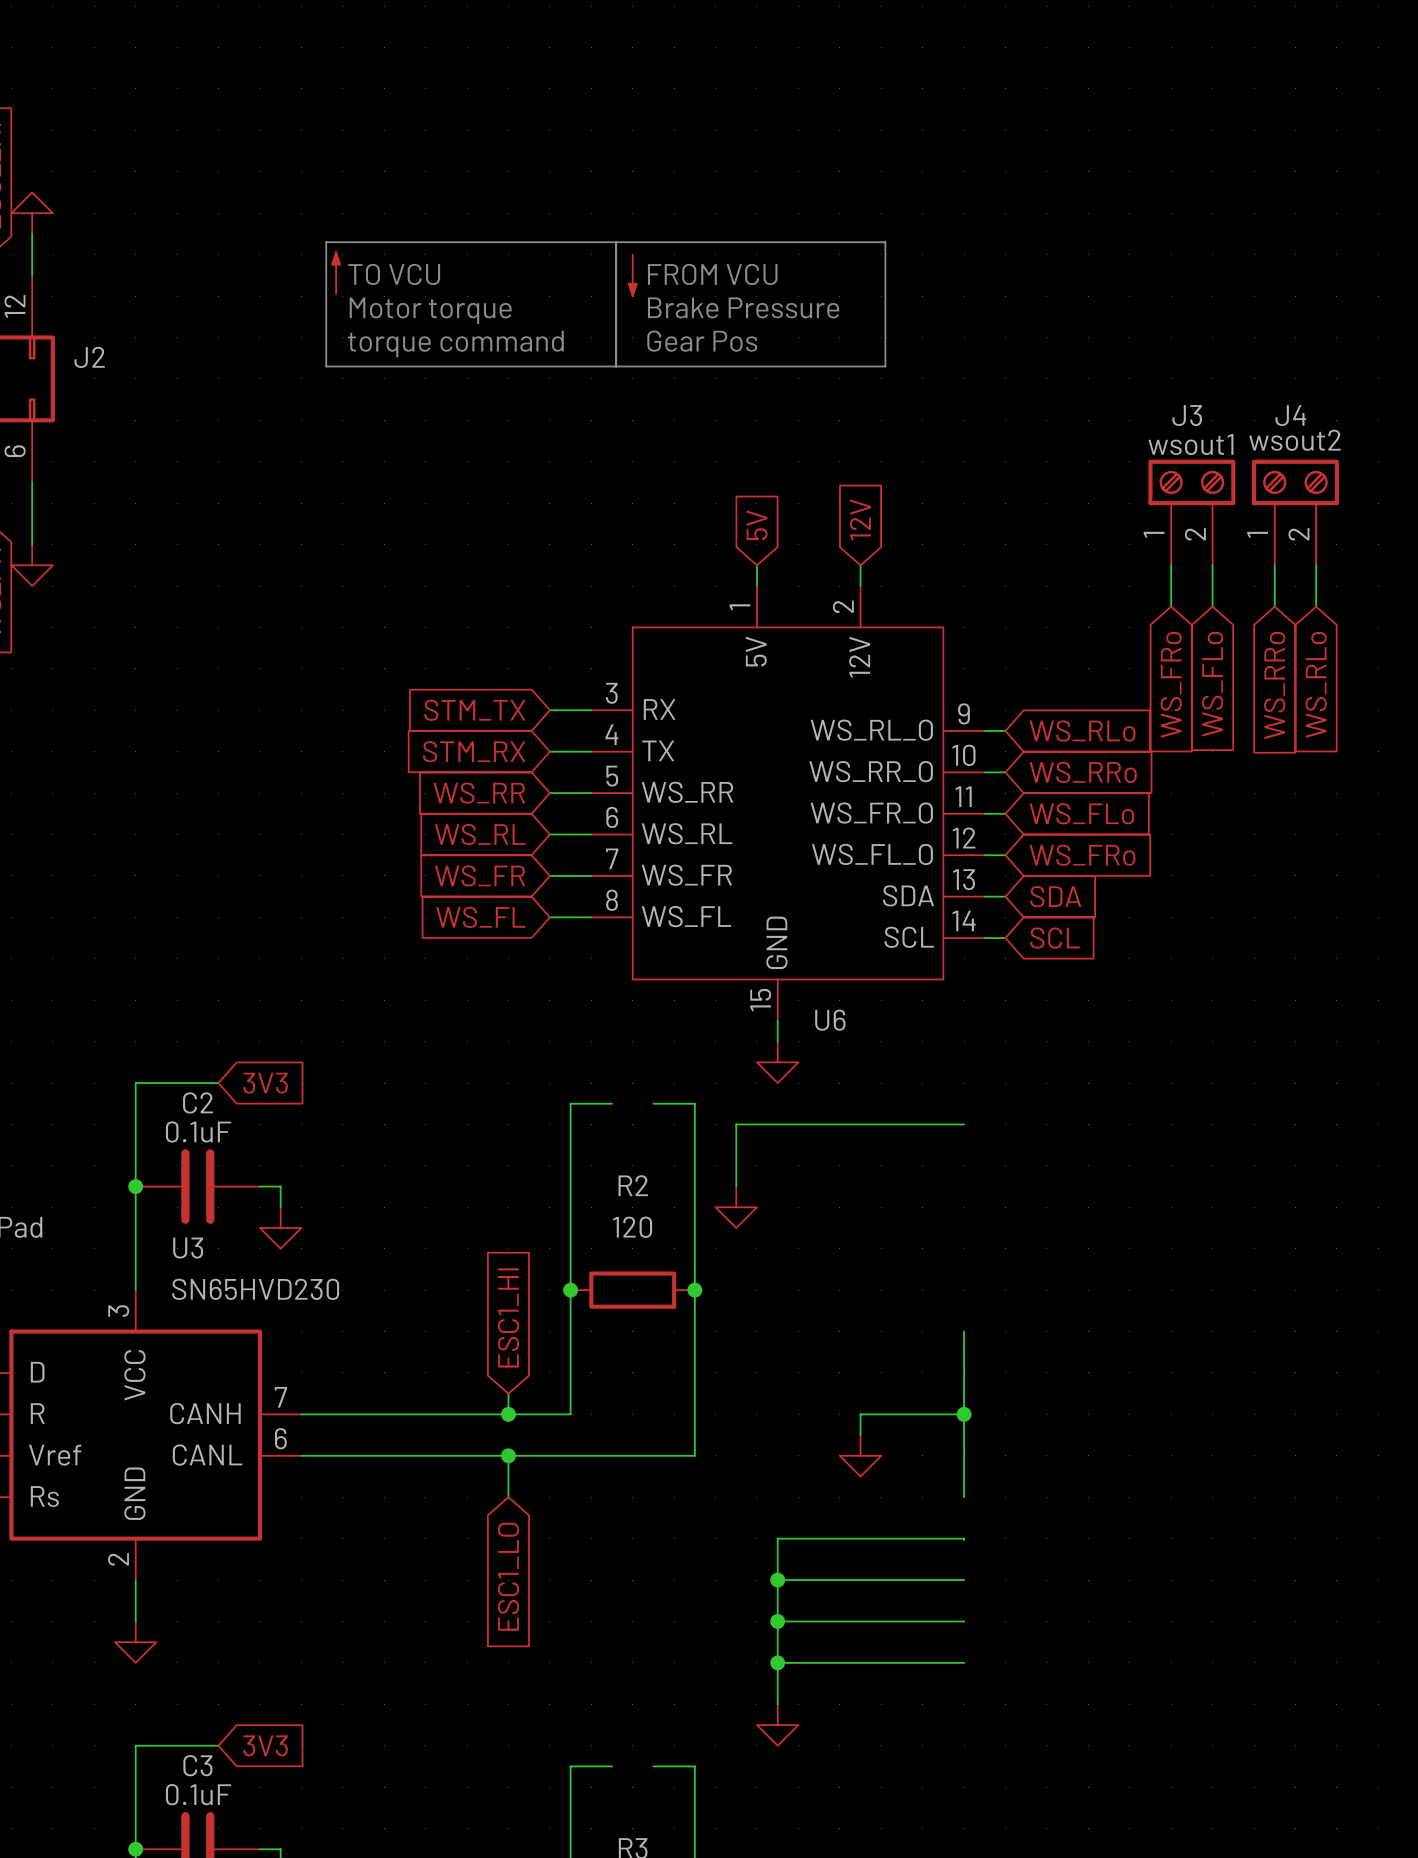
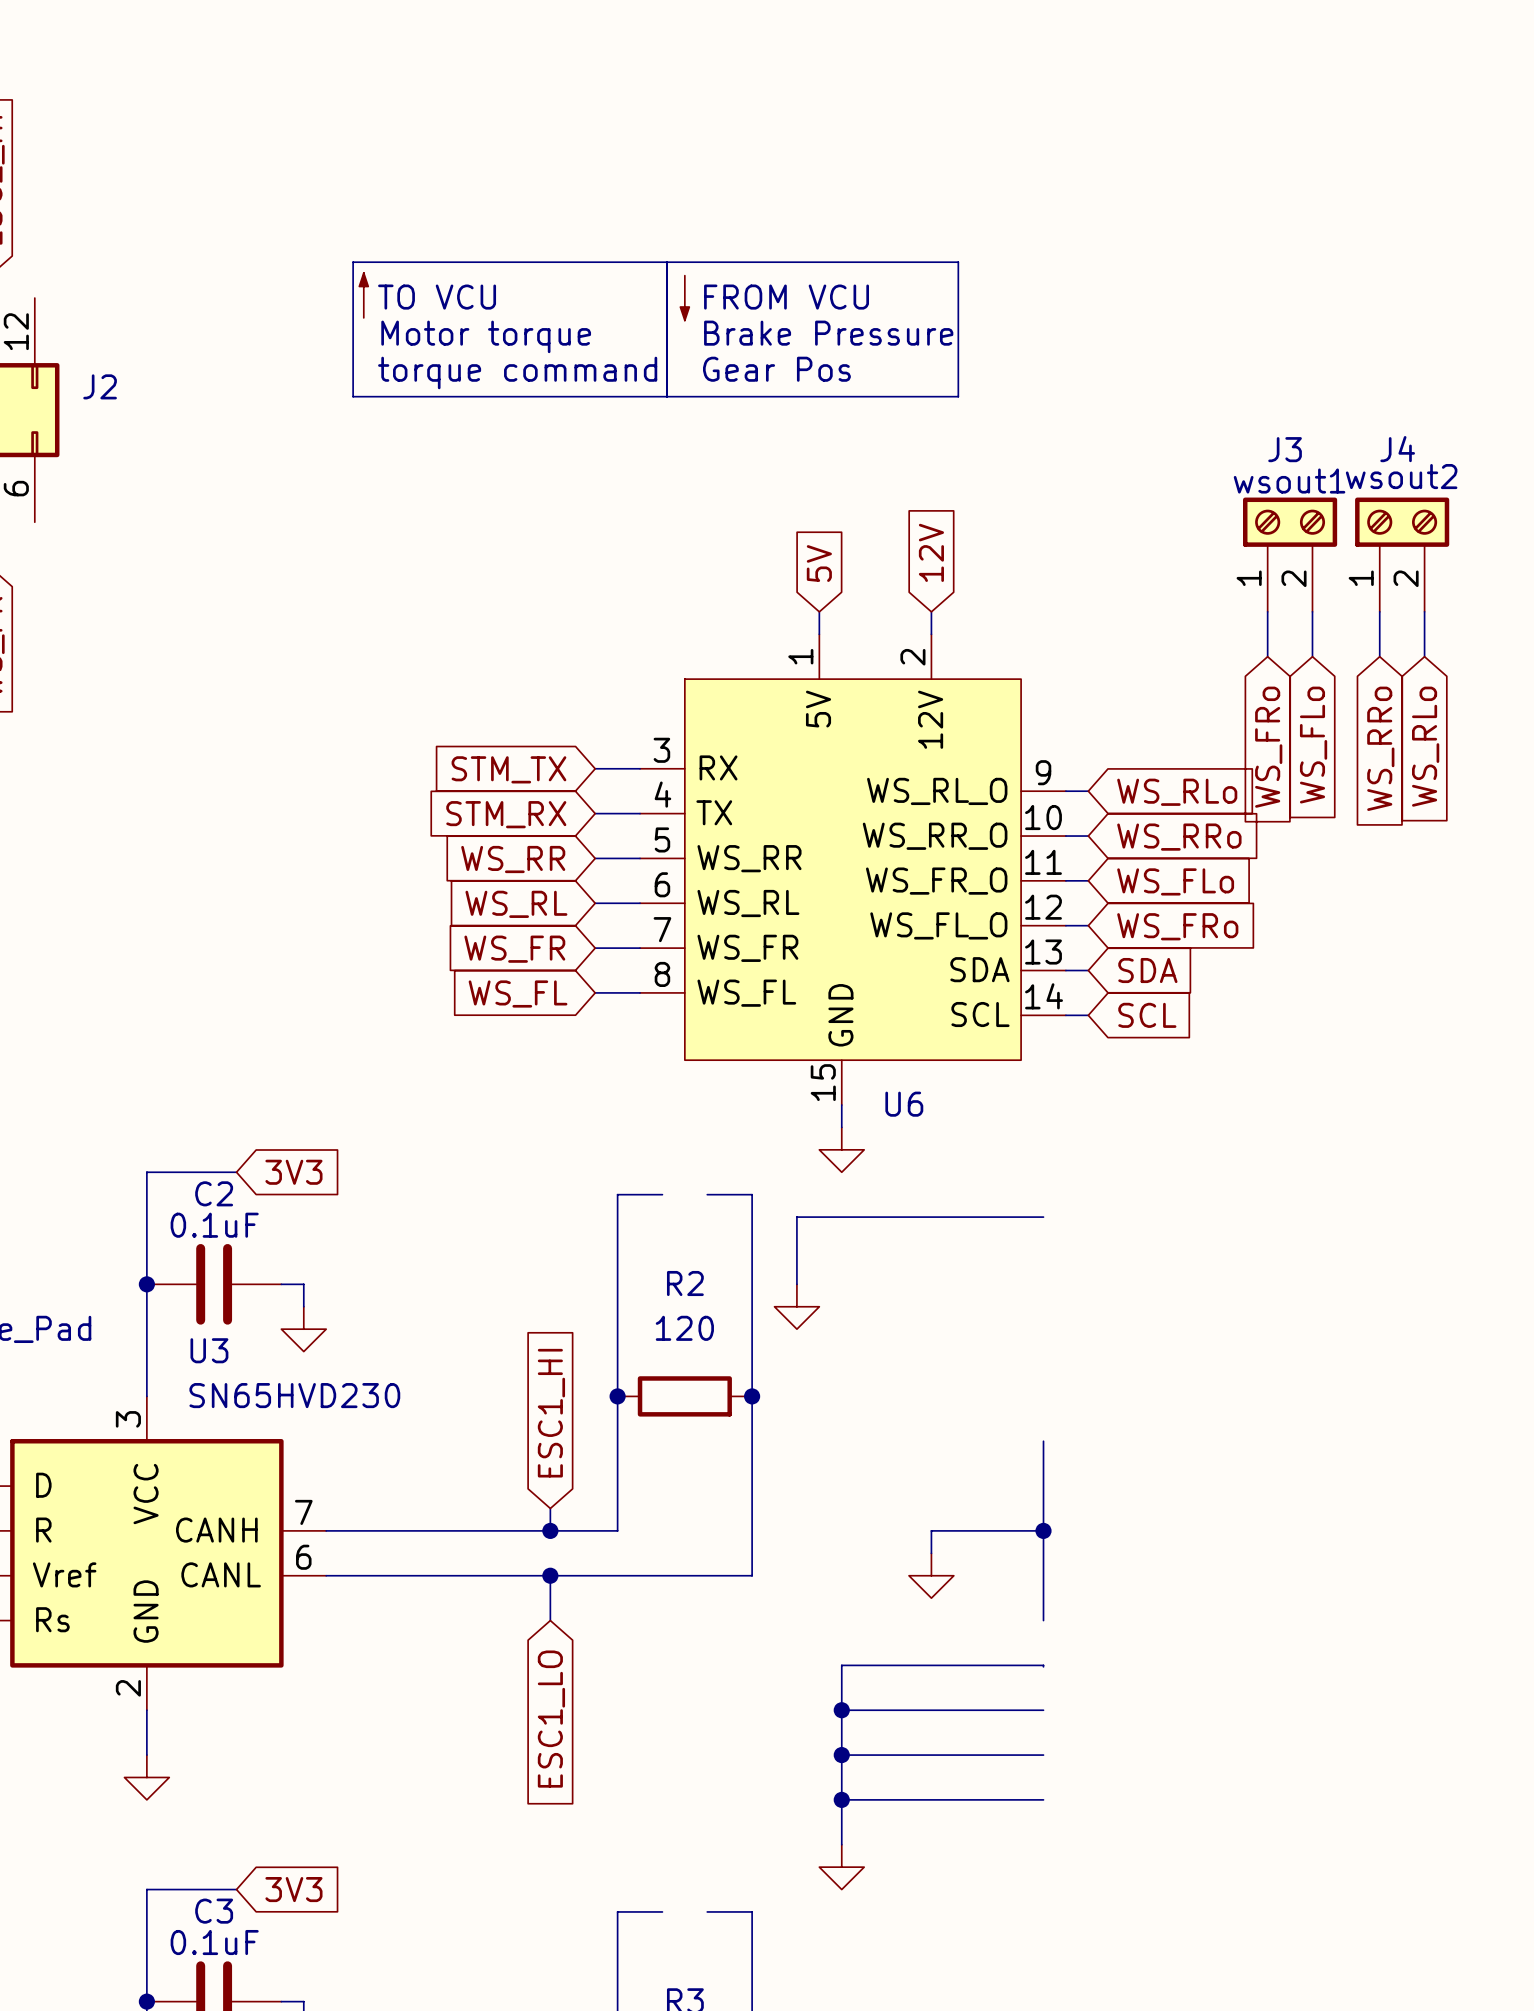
power symbol: (32, 213) -> none
wire: (32, 233) (32, 275) -> none
wire: (32, 482) (32, 544) -> none
power symbol: (32, 565) -> none

